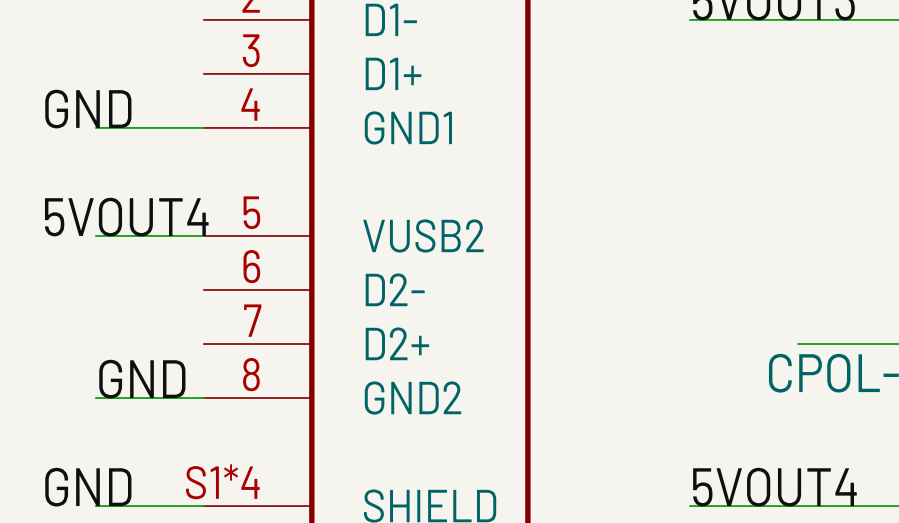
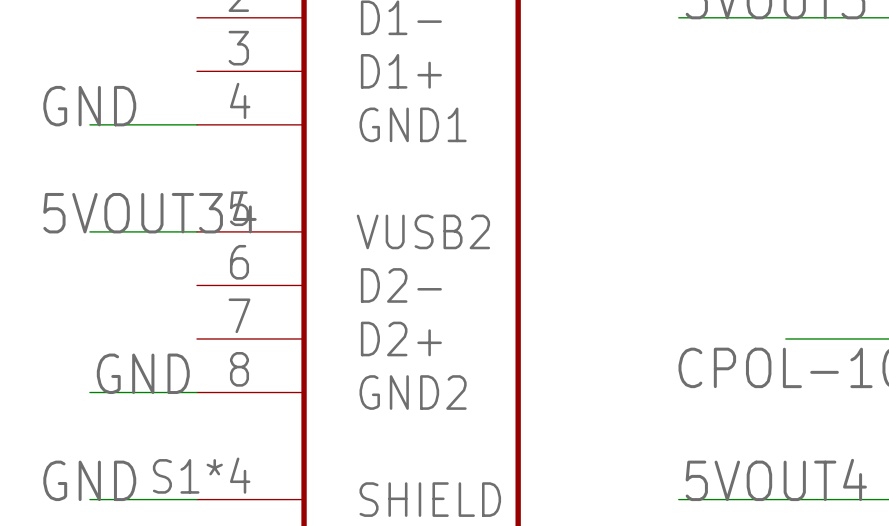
label: 5VOUT4 (126, 217) -> 5VOUT34 (149, 212)

